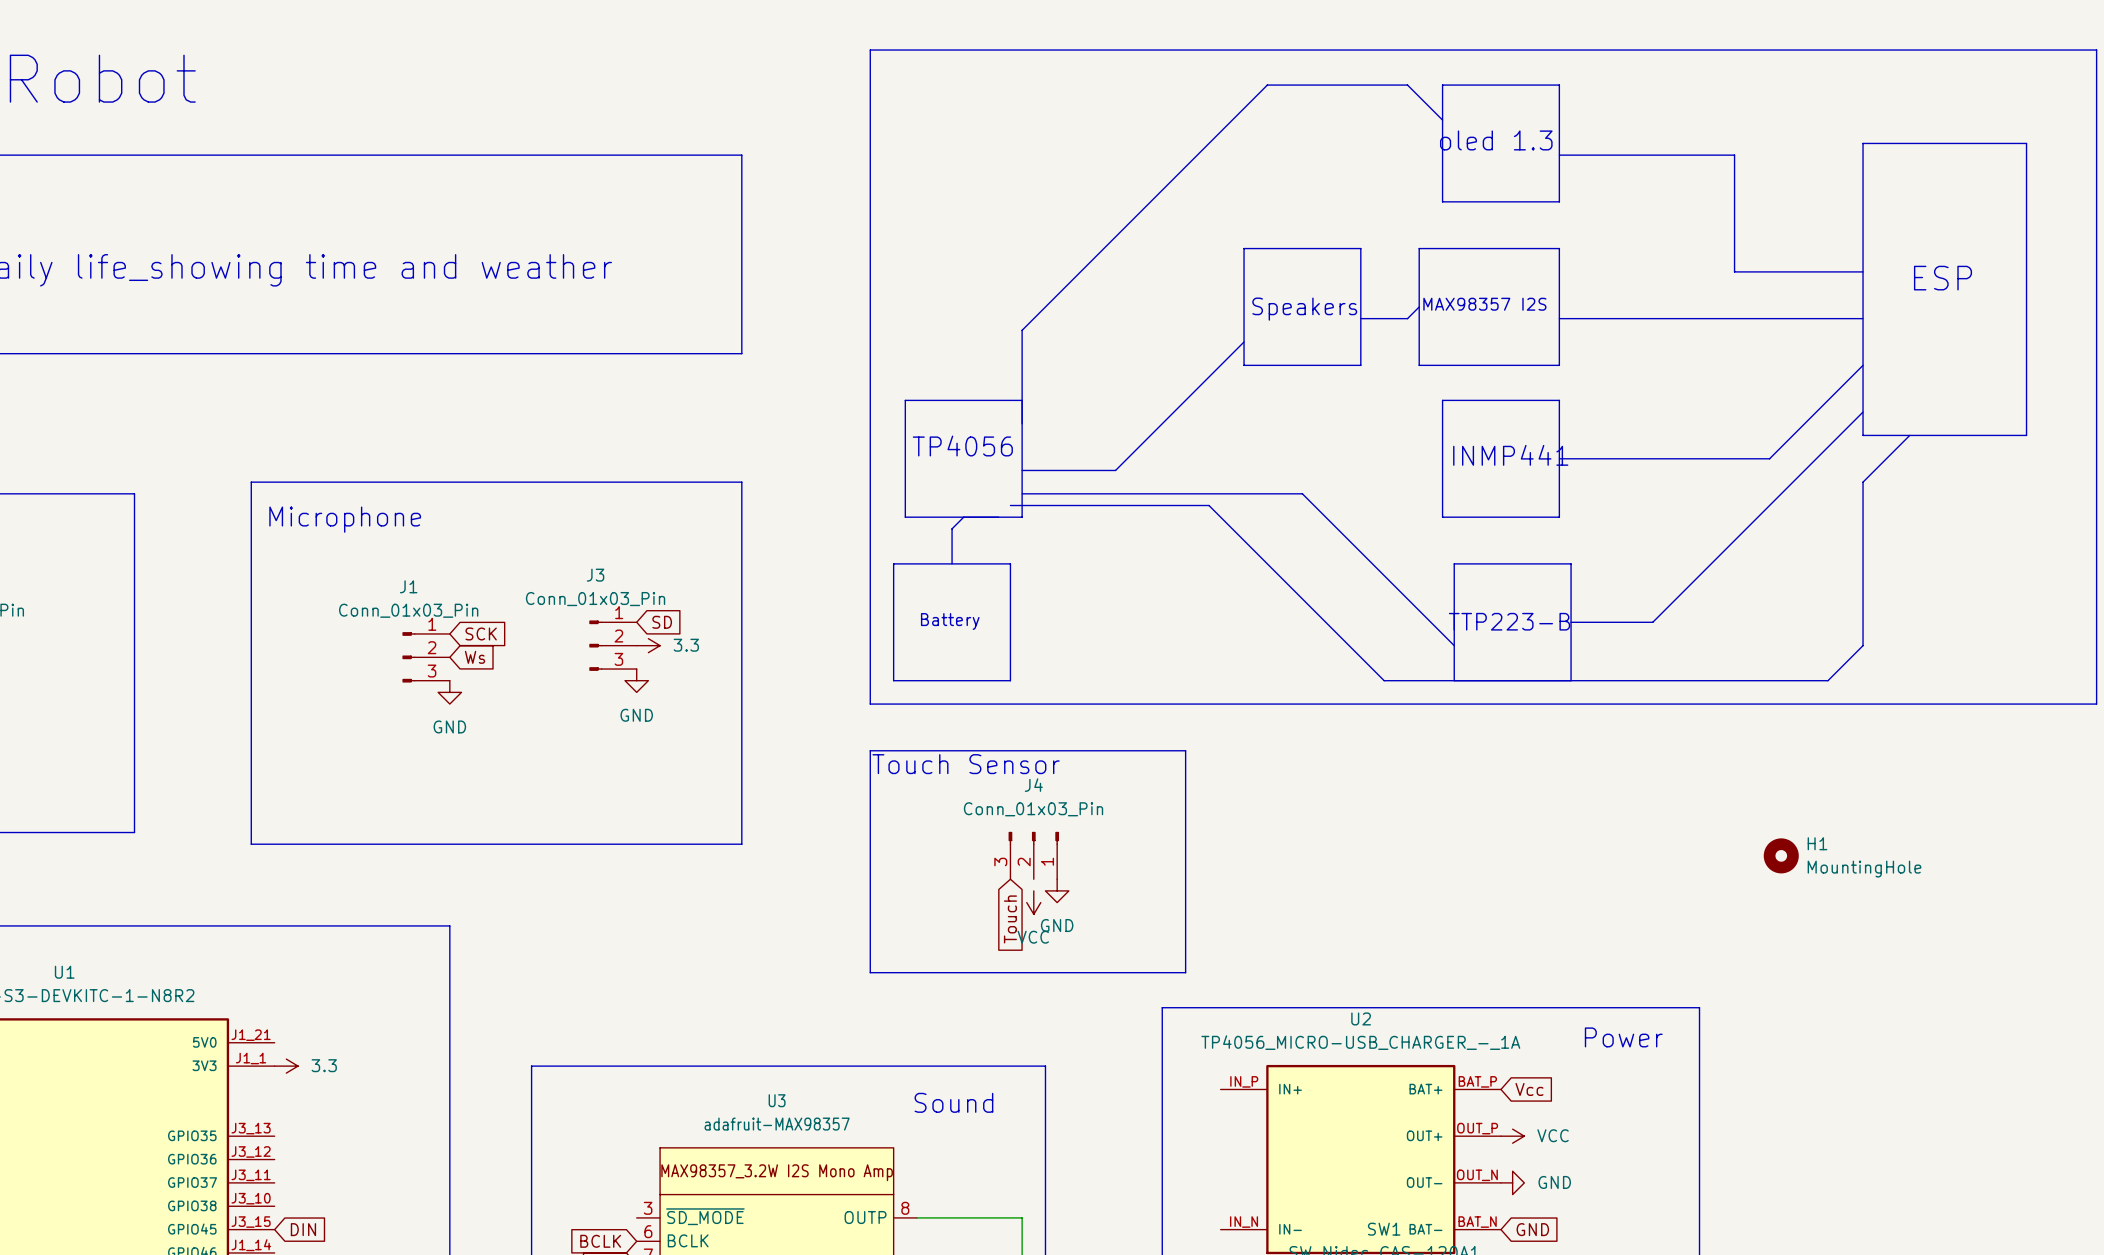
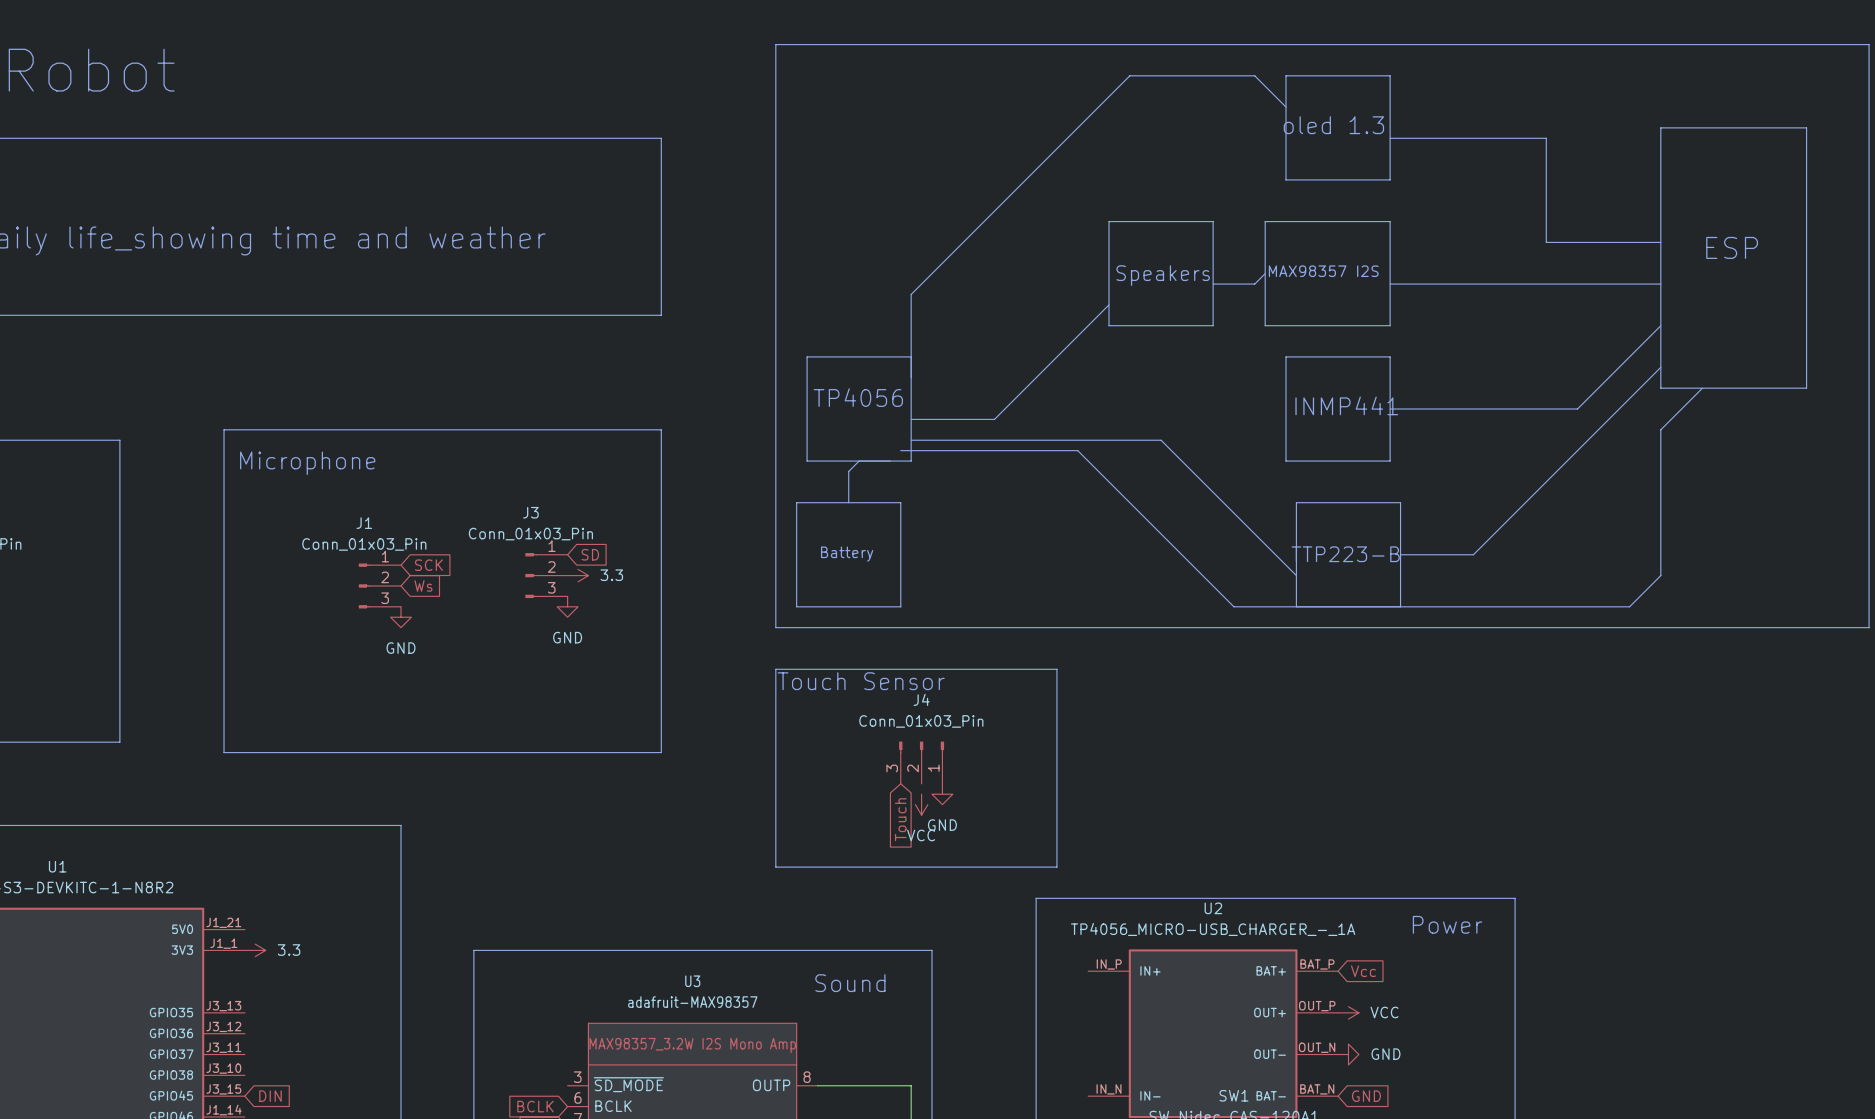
H1: MountingHole (1781, 855) -> none

